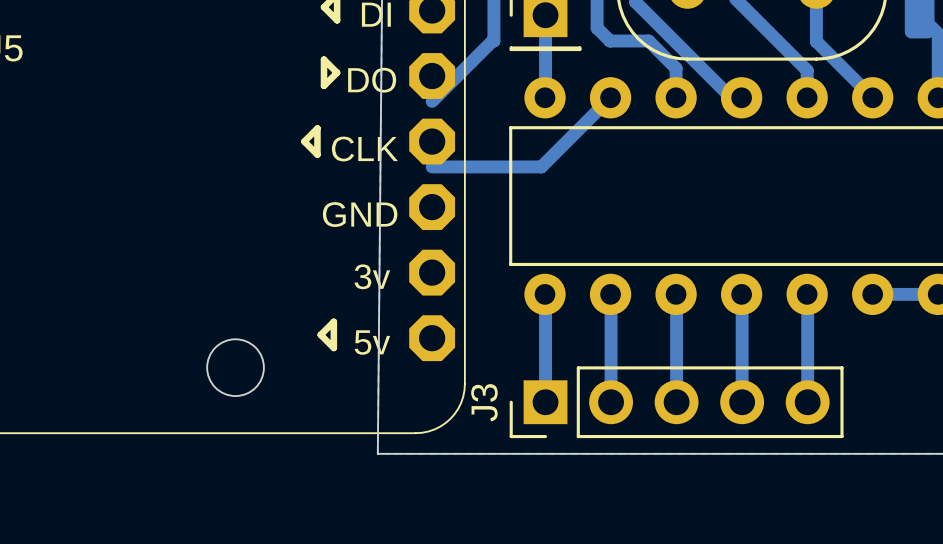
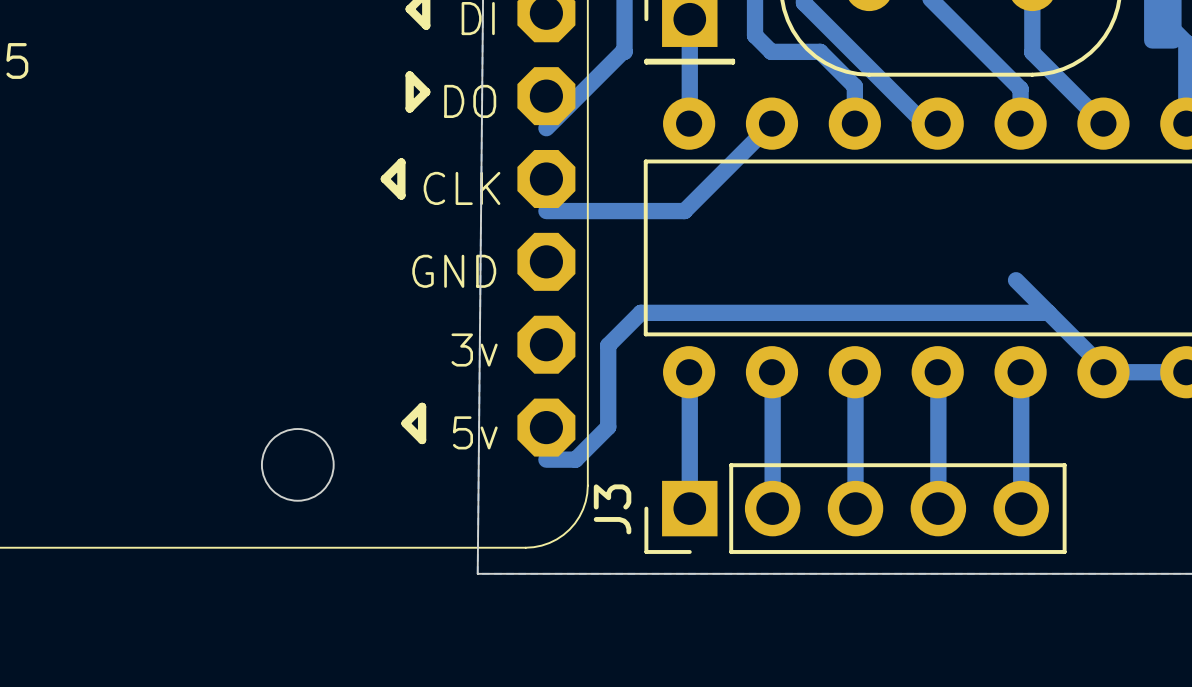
bottom track: none -> (1016, 280) (1103, 367)
bottom track: none -> (1048, 312) (640, 312) (608, 345) (608, 427) (575, 459) (546, 459)

